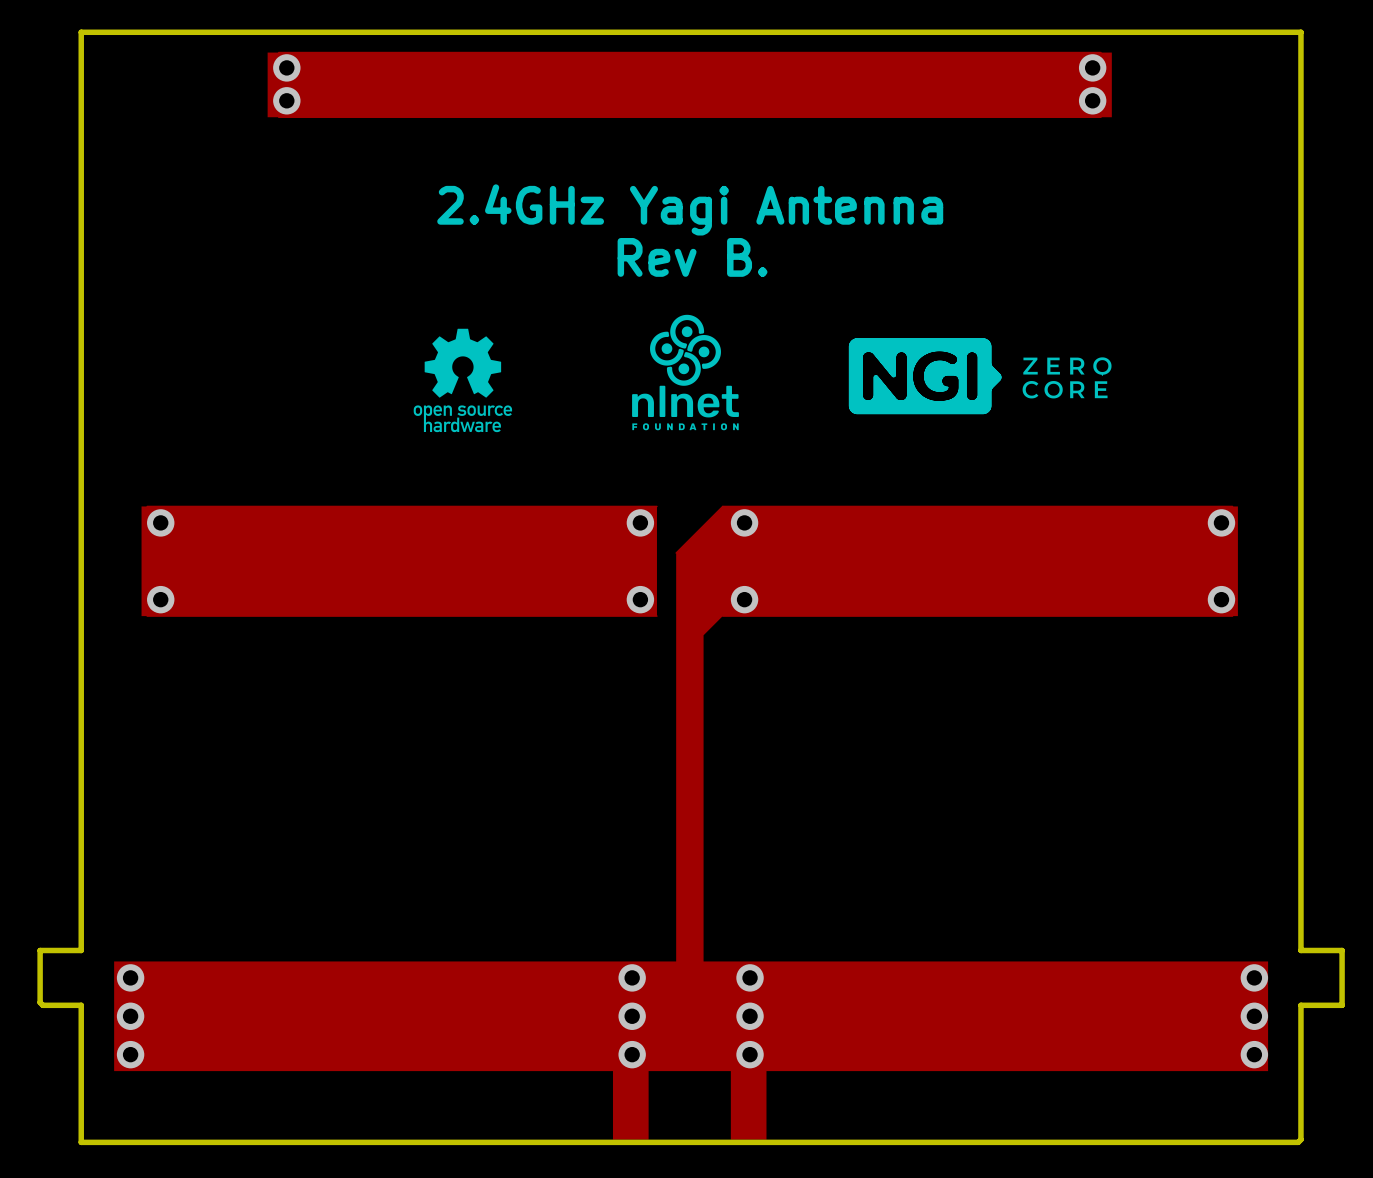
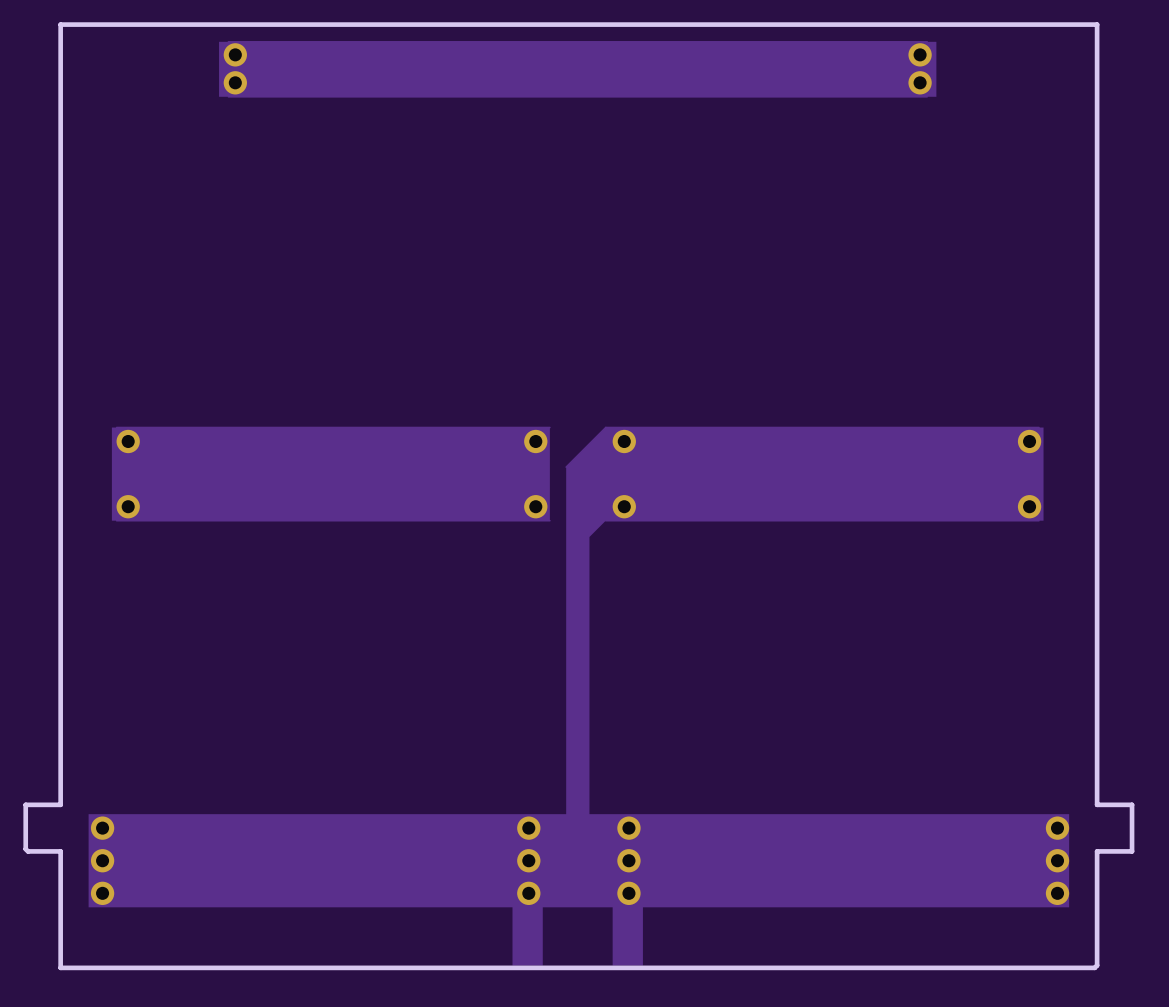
text: 2.4GHz Yagi Antenna (690, 209) -> none
text: Rev B. (692, 257) -> none
drawing: [632, 314, 739, 431] -> none
drawing: [413, 328, 513, 433] -> none
drawing: [848, 338, 1112, 415] -> none

